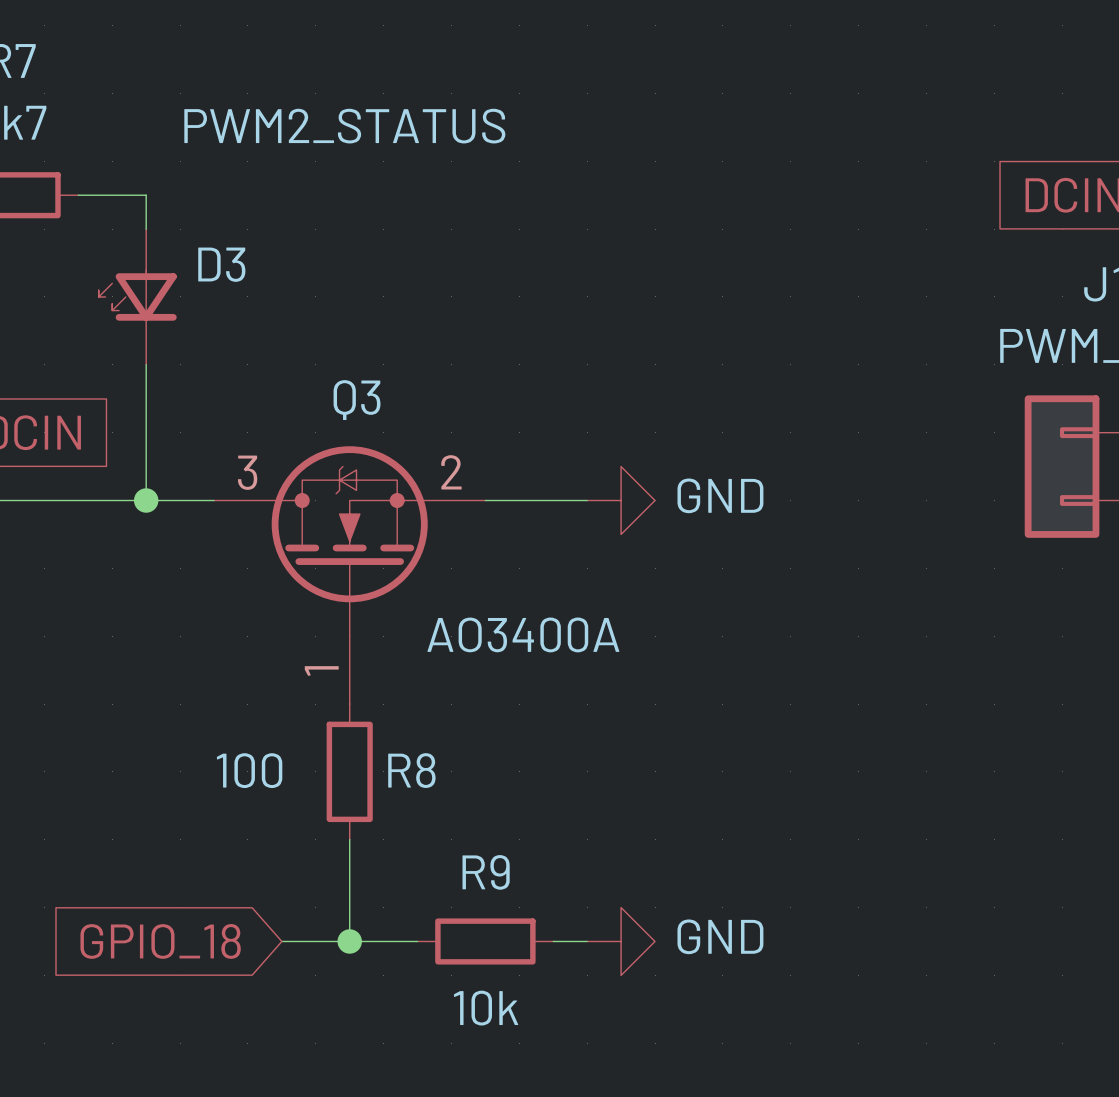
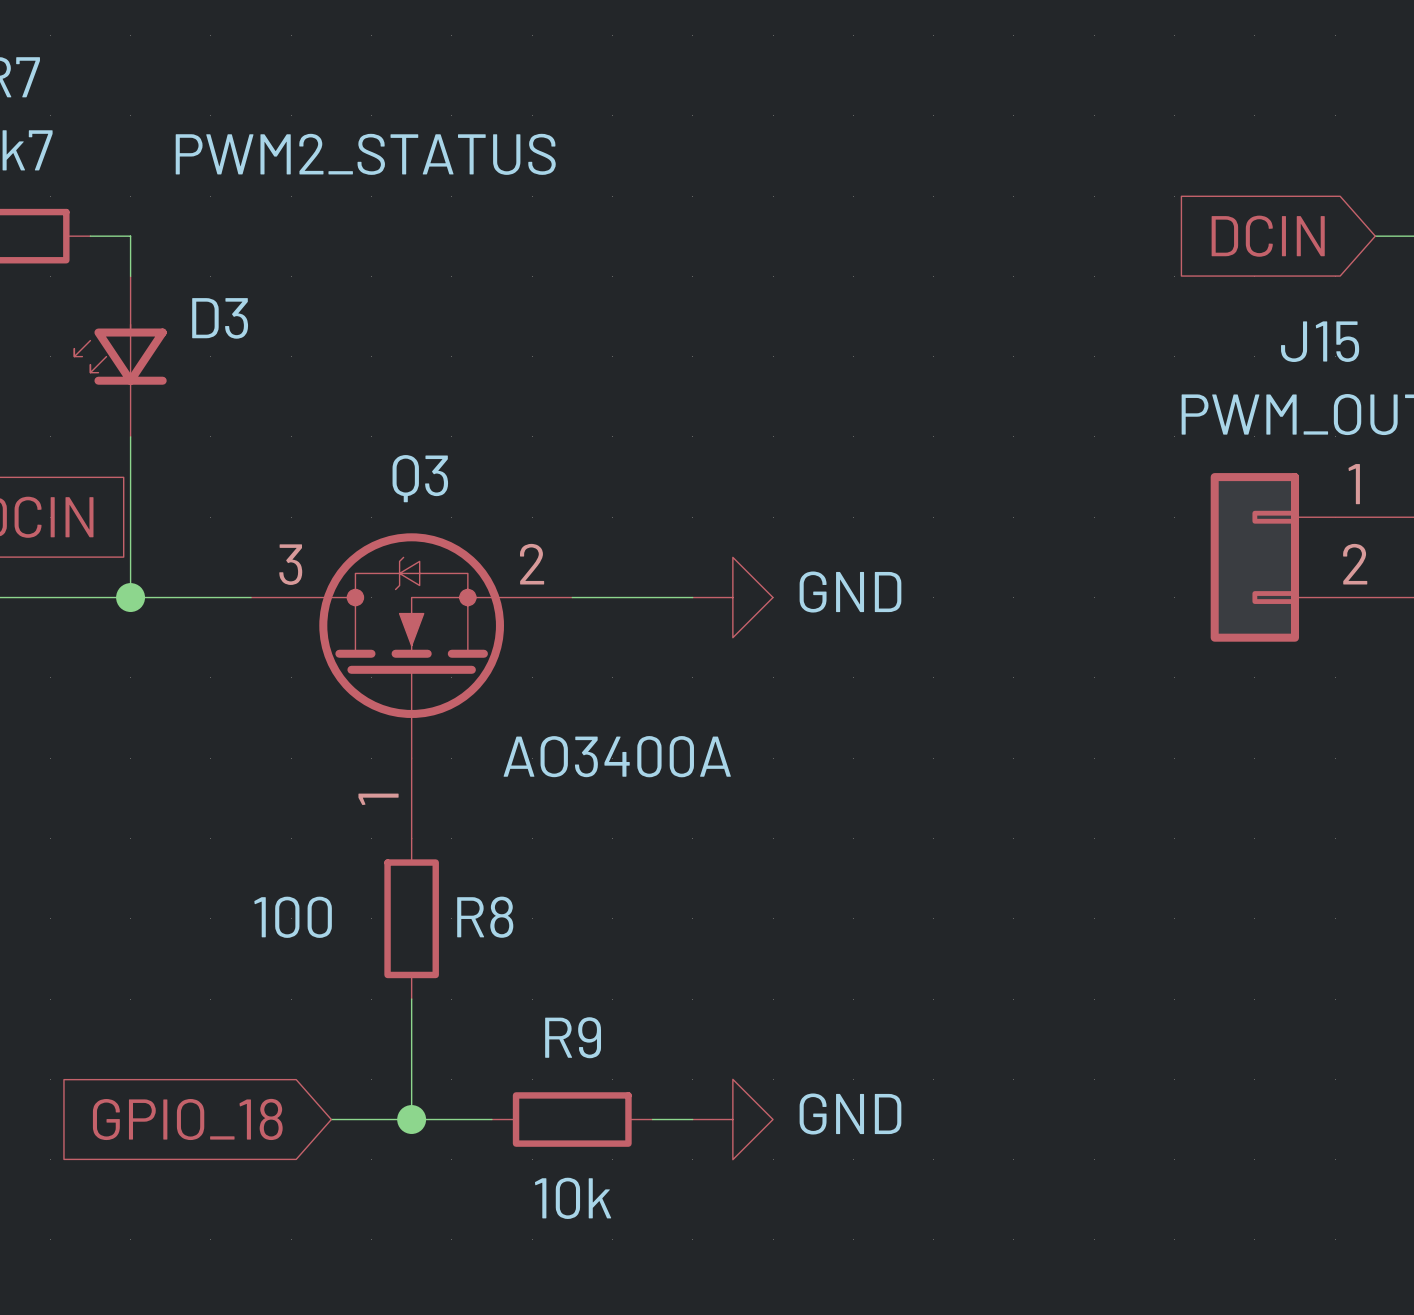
wire: (112, 195) (146, 195) (146, 229) -> (130, 236) (130, 276)
D3 position: (137, 296) -> (120, 356)
wire: (146, 364) (146, 500) -> (130, 436) (130, 597)
junction position: (146, 500) -> (130, 597)

